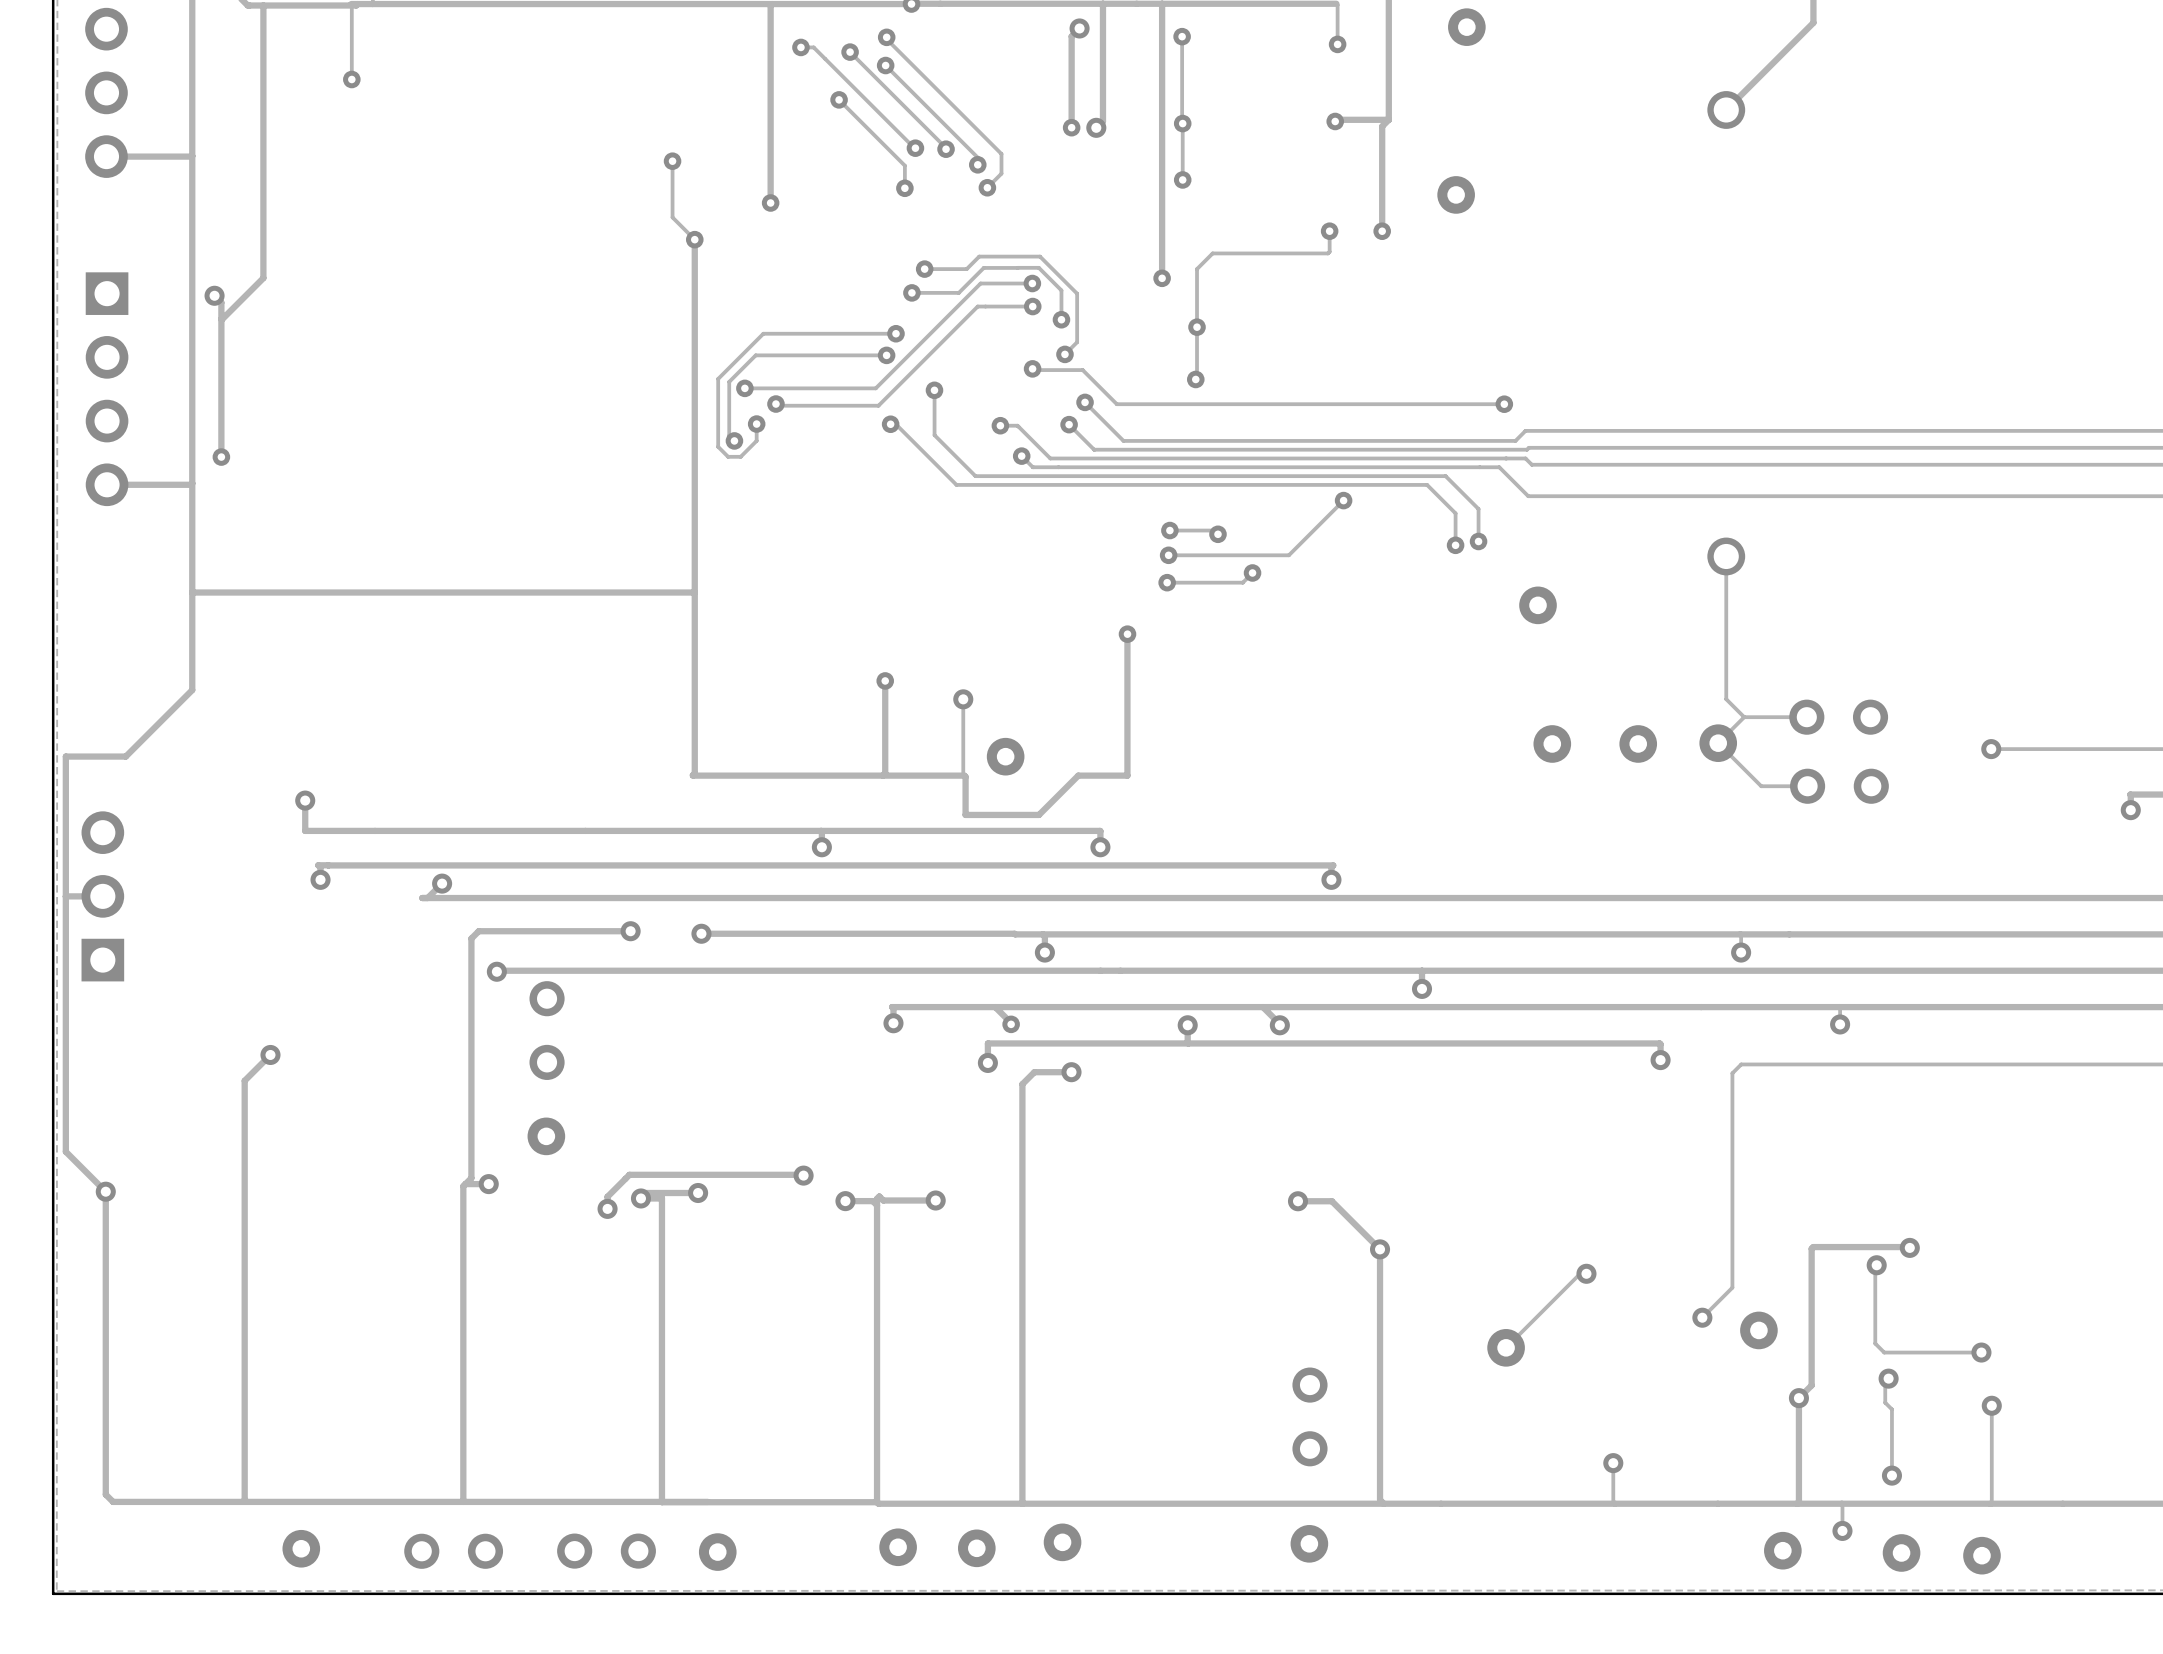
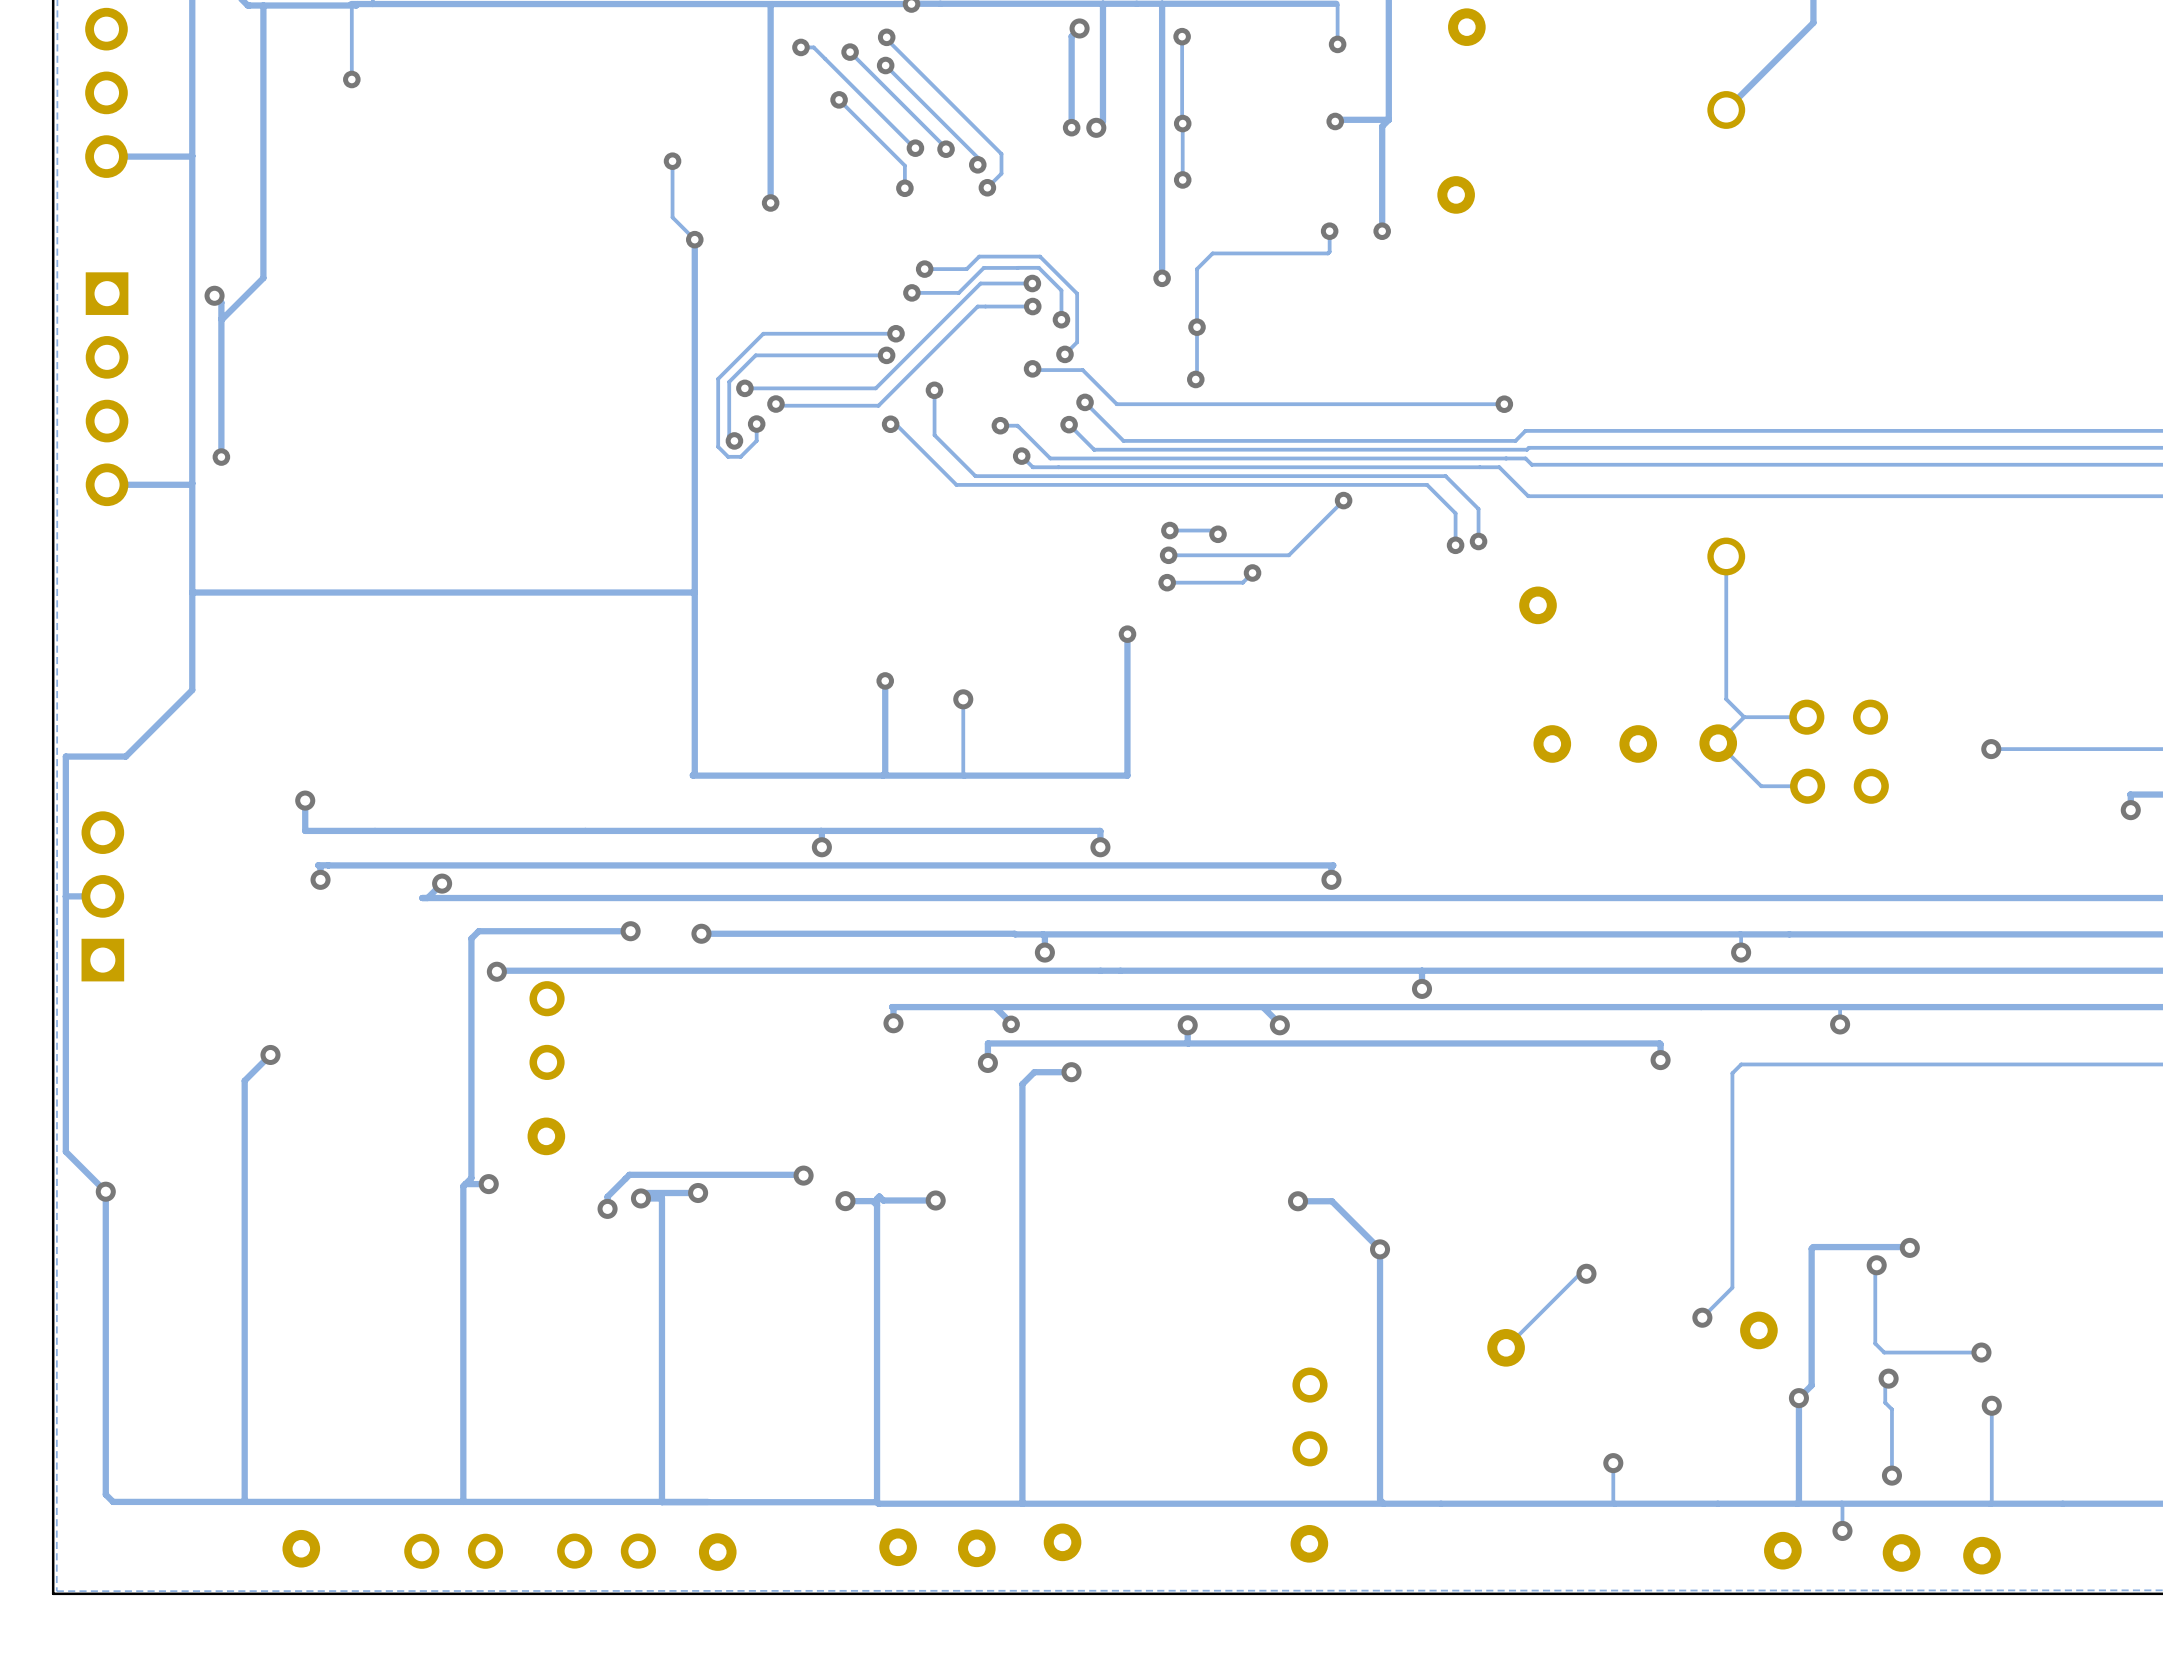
part: (1005, 756) -> none
track: (1078, 775) (1038, 814) (965, 814) (964, 775) -> (1078, 775) (964, 775)

